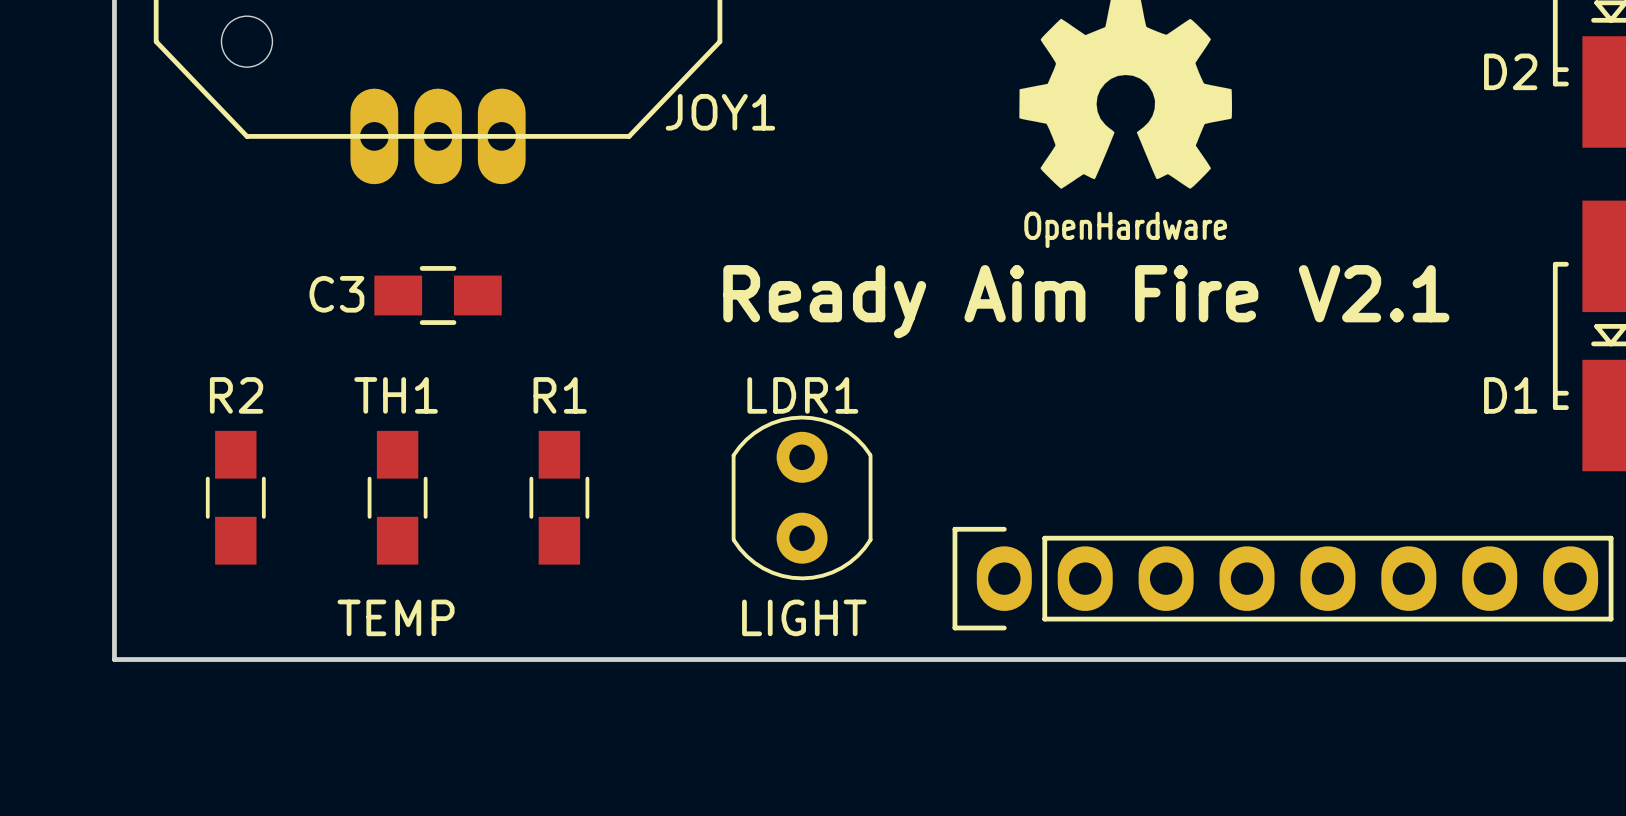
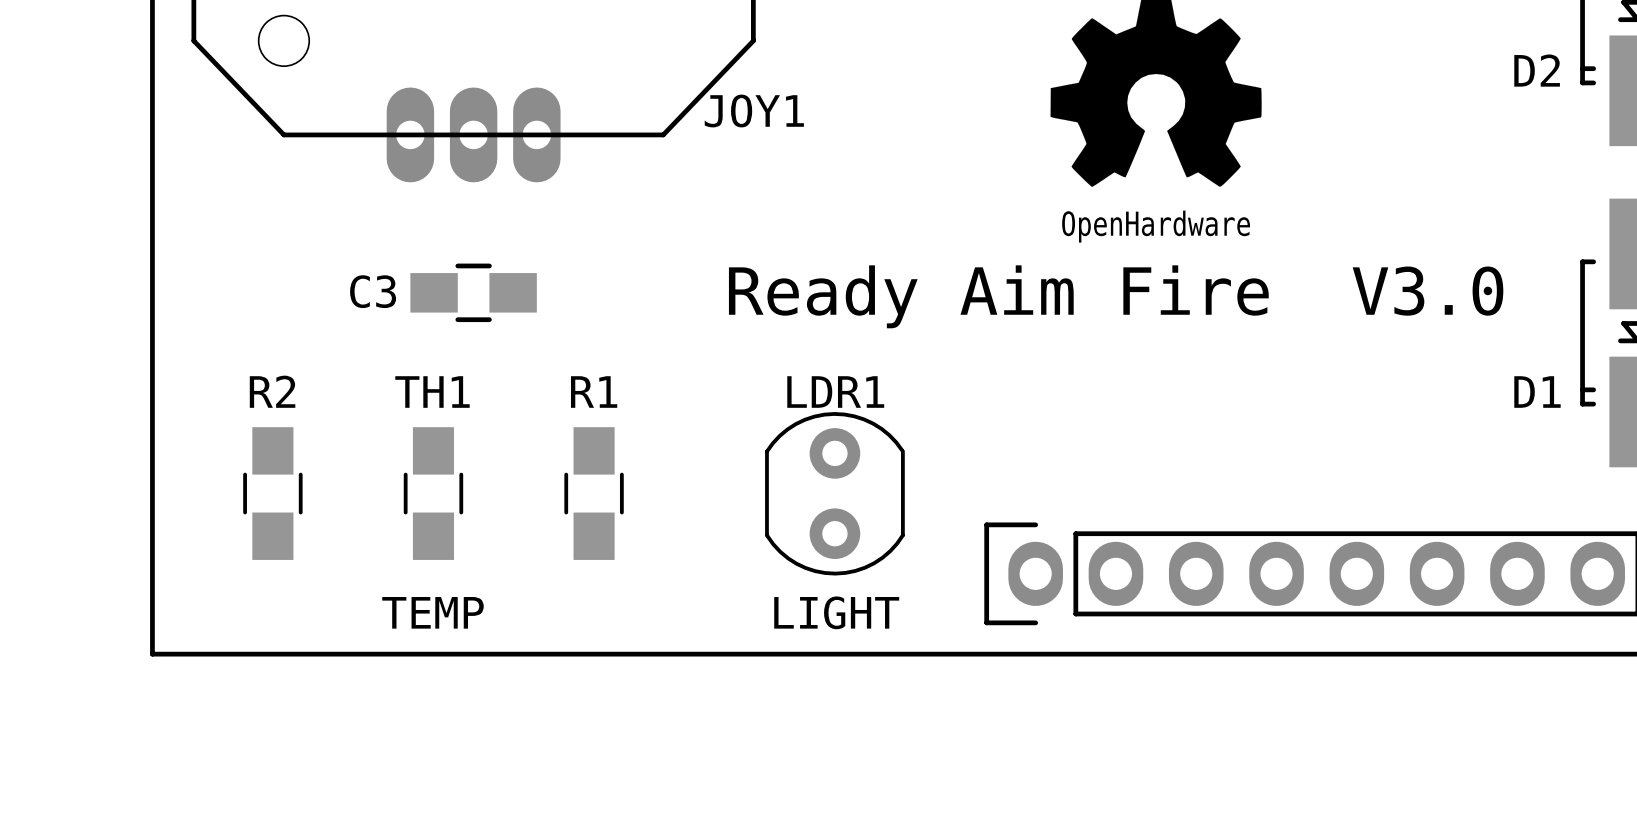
text: Ready Aim Fire V2.1 (1086, 301) -> Ready Aim Fire V3.0 (1116, 296)

